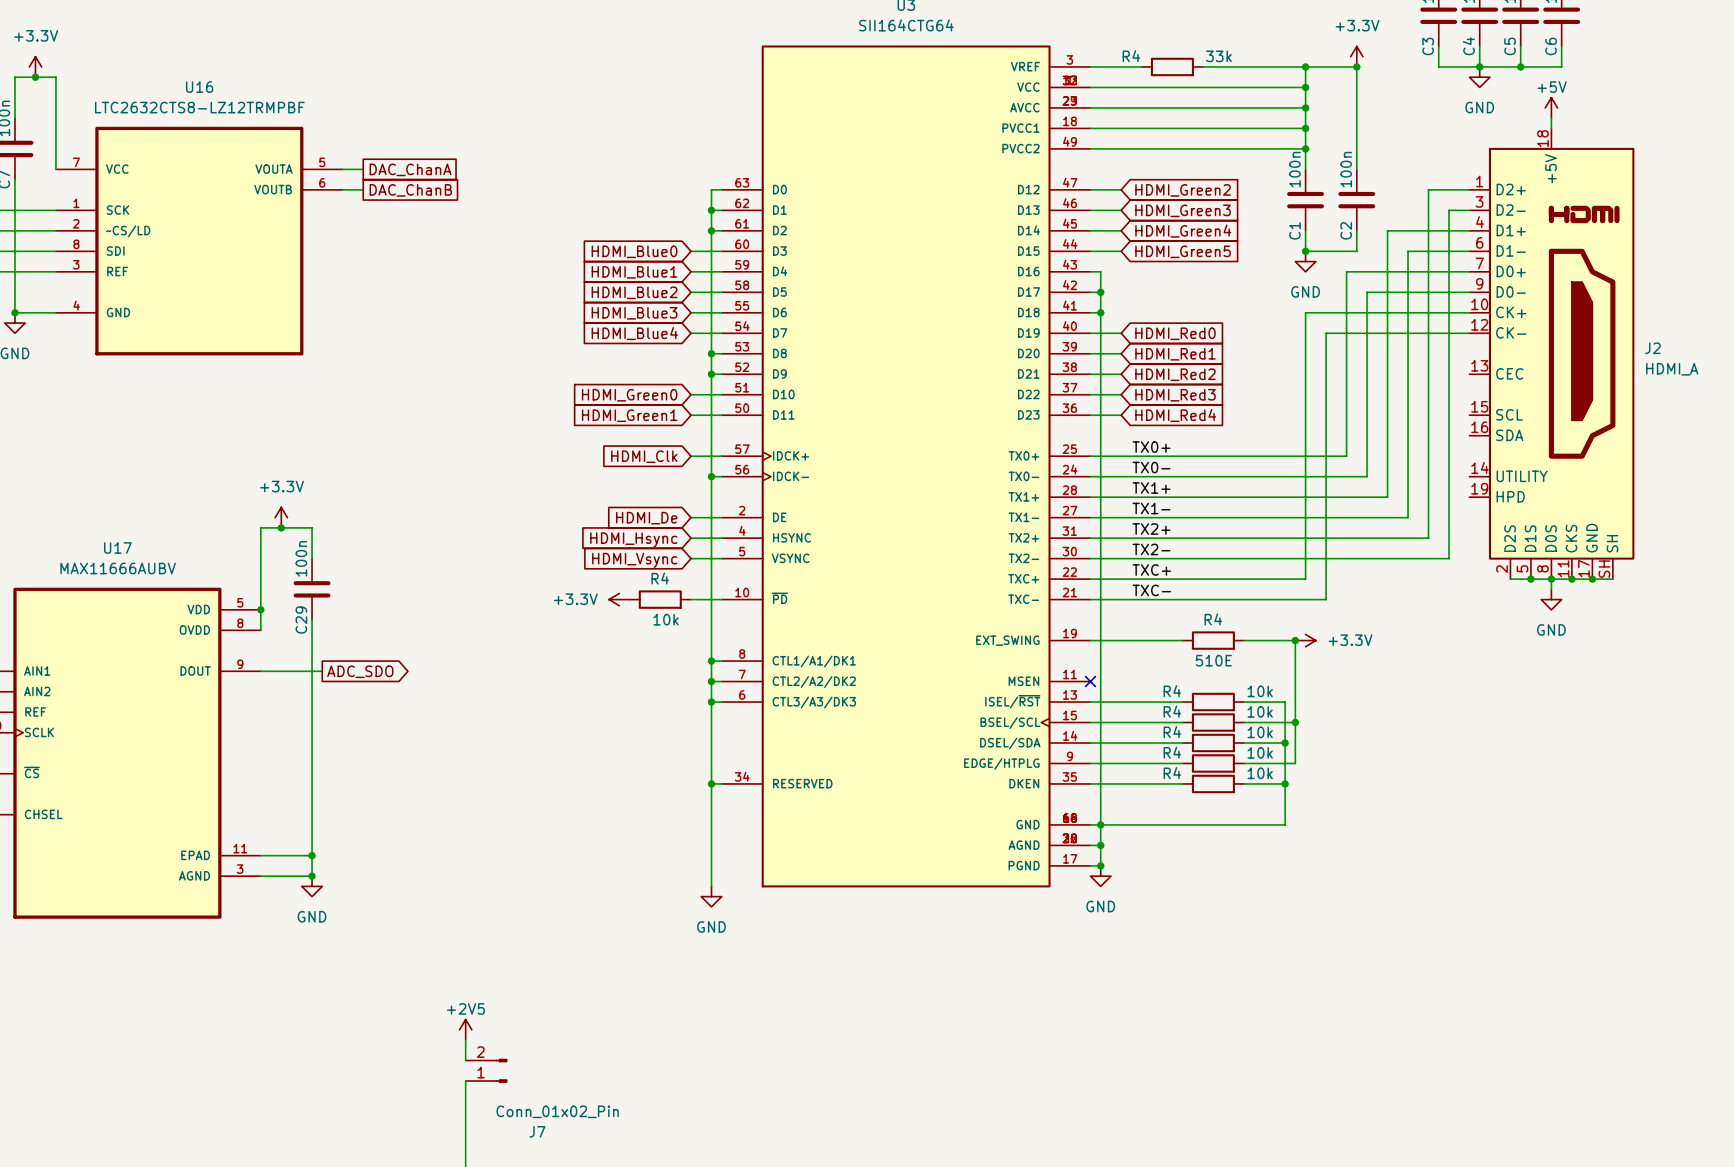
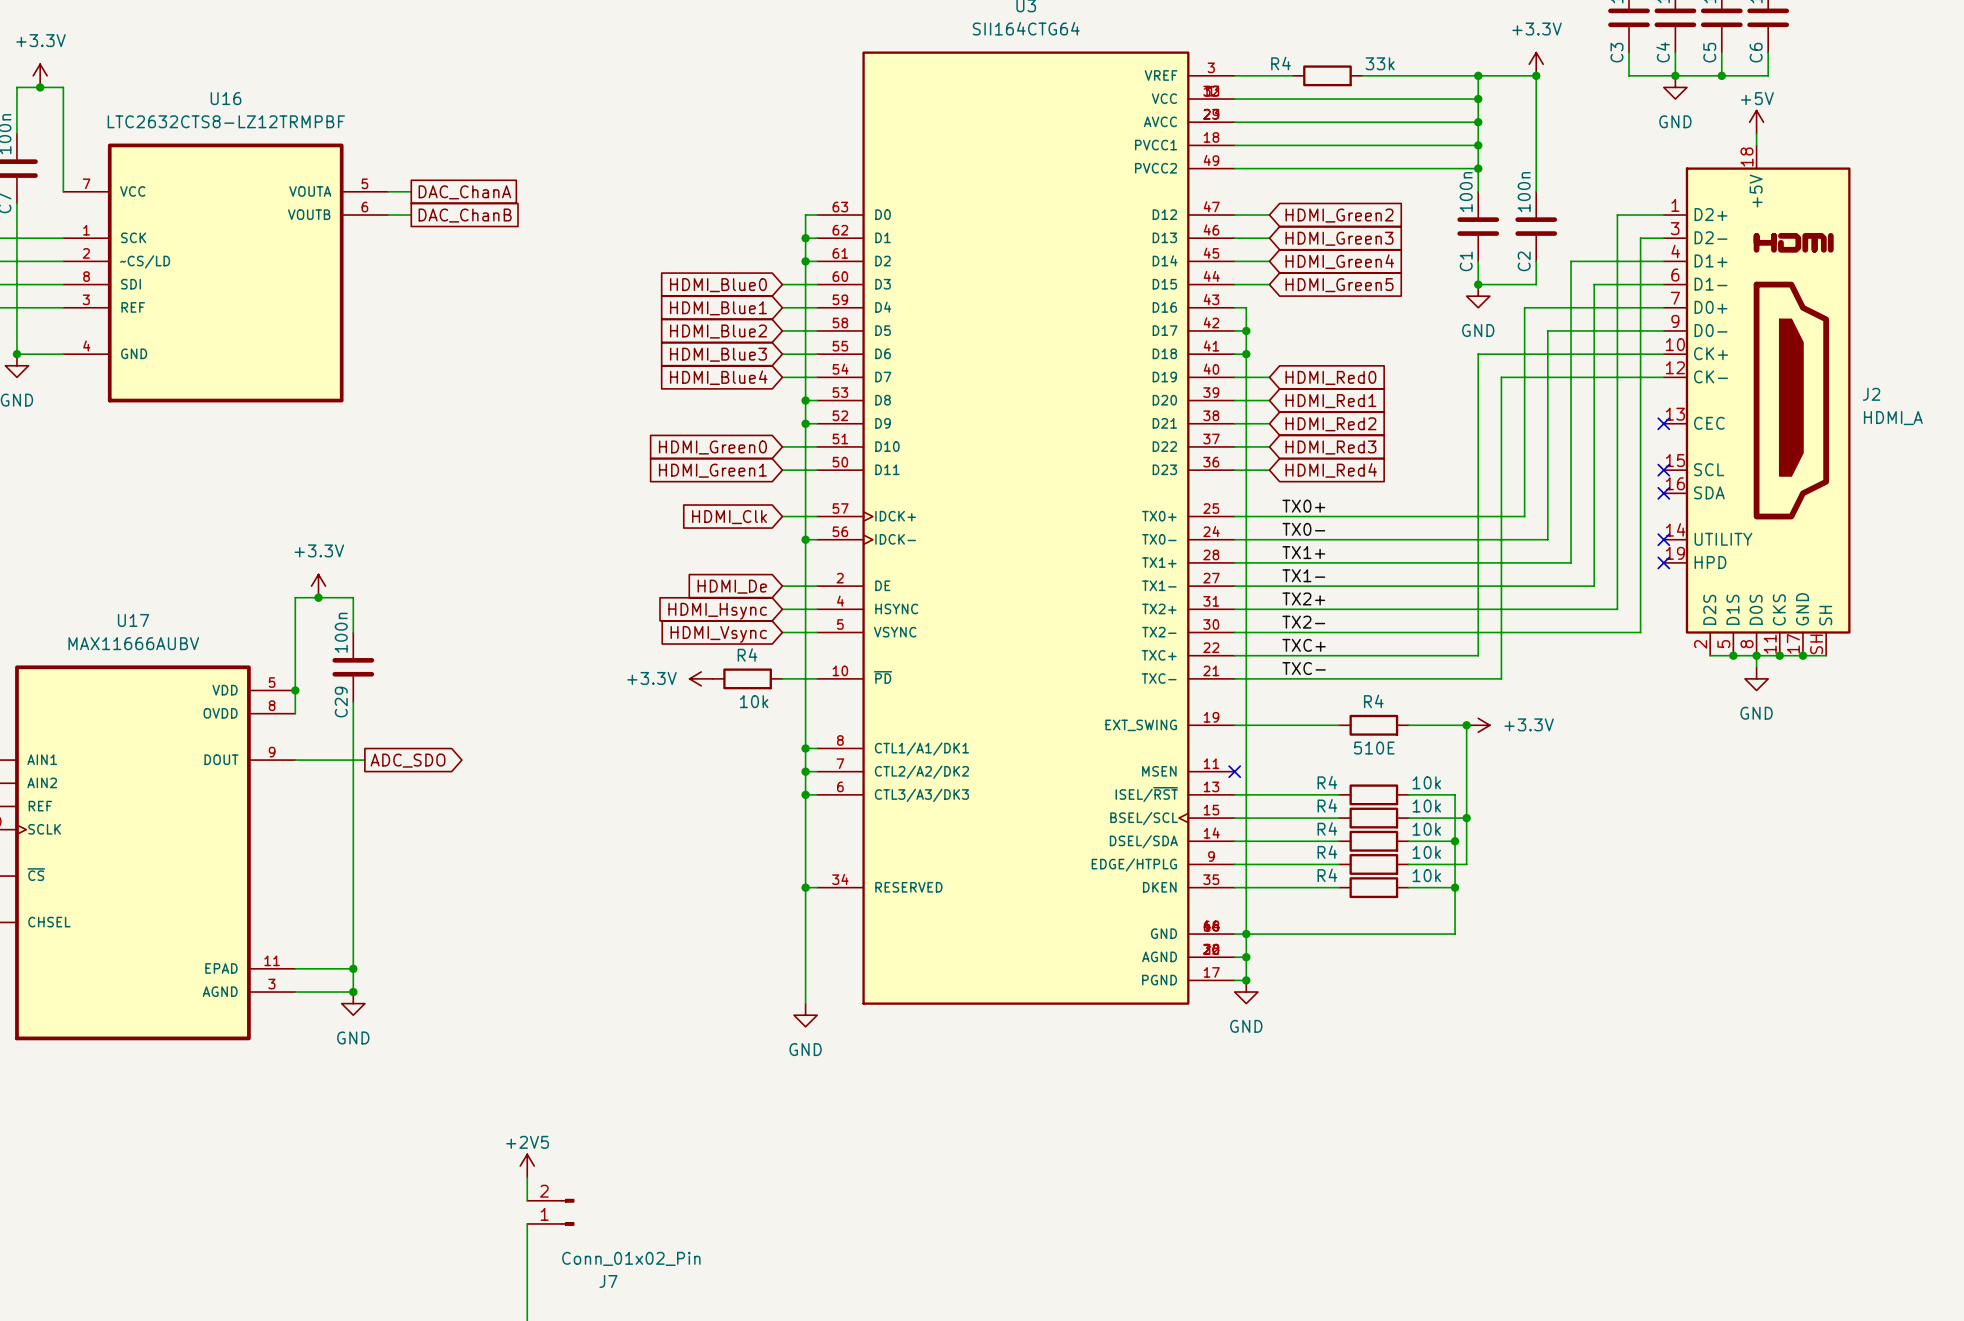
no-connect mark: none -> (1663, 423)
no-connect mark: none -> (1663, 470)
no-connect mark: none -> (1663, 493)
no-connect mark: none -> (1663, 539)
no-connect mark: none -> (1663, 562)

